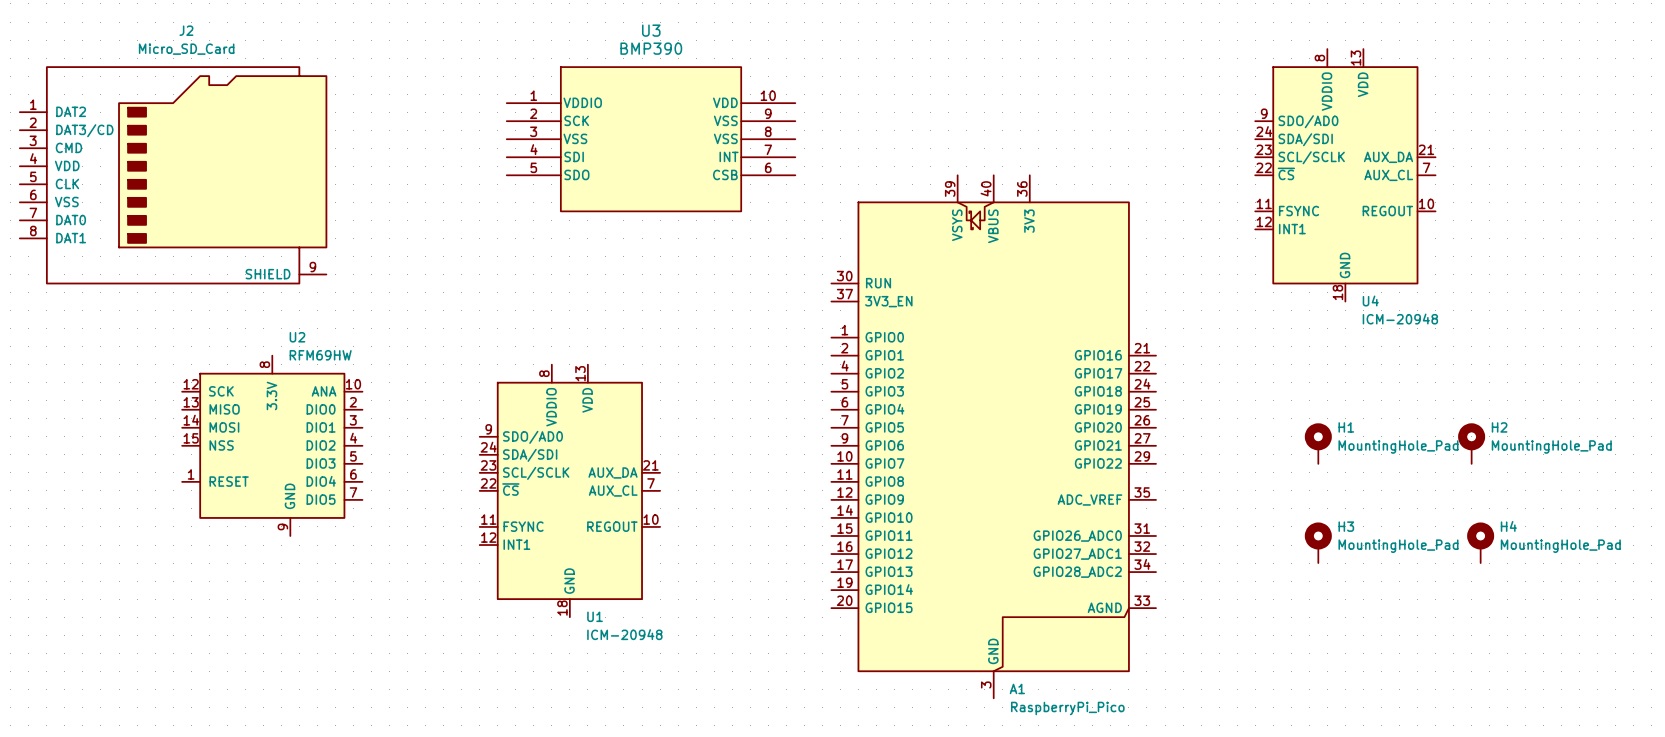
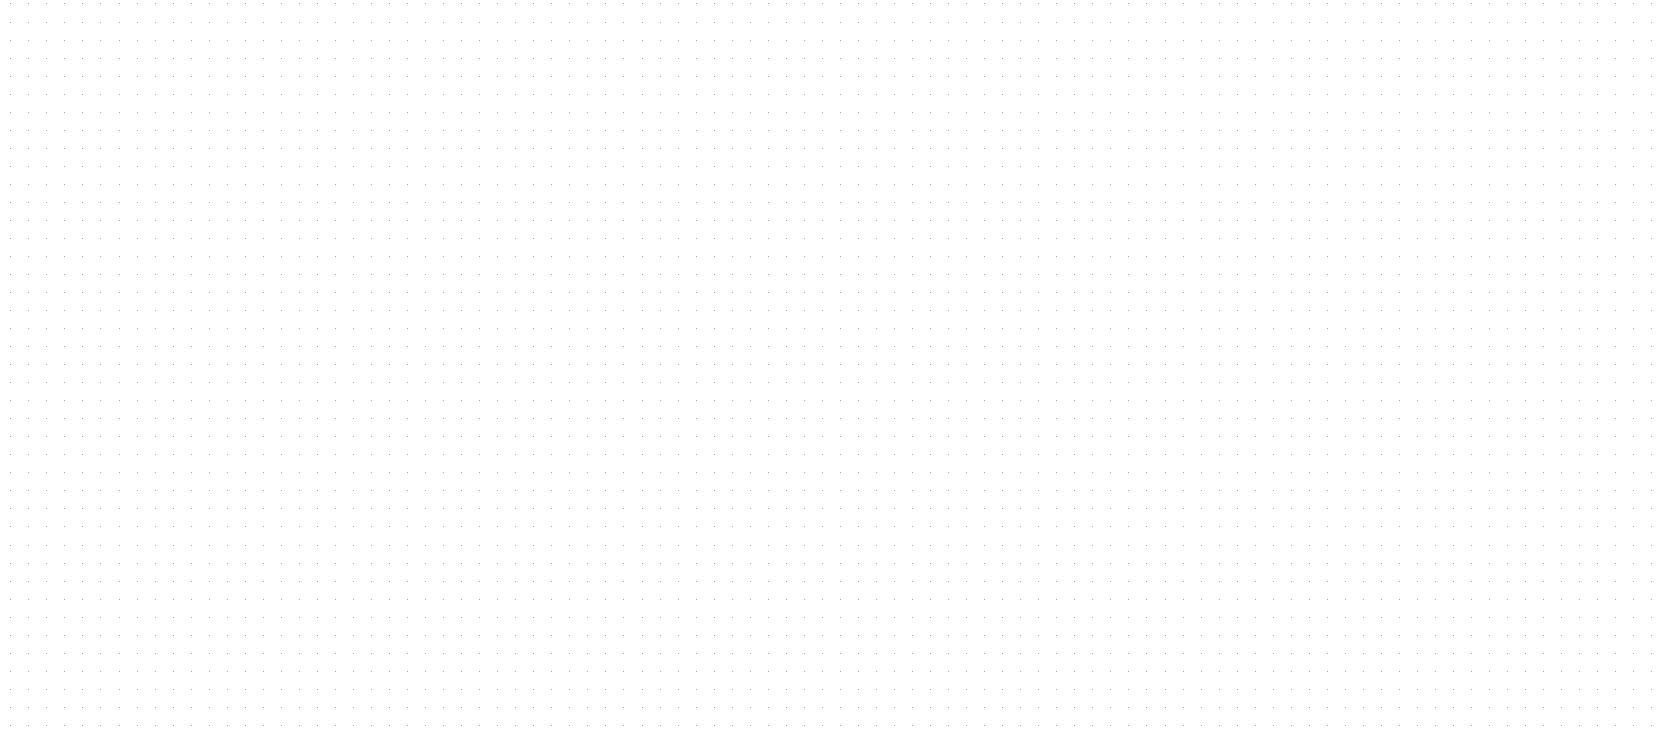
U3: BMP390 (651, 139) -> none
J2: Micro_SD_Card (173, 175) -> none
U4: ICM-20948 (1345, 175) -> none
A1: RaspberryPi_Pico (993, 436) -> none
H1: MountingHole_Pad (1318, 443) -> none
H2: MountingHole_Pad (1471, 443) -> none
U2: RFM69HW (272, 445) -> none
U1: ICM-20948 (569, 490) -> none
H3: MountingHole_Pad (1318, 542) -> none
H4: MountingHole_Pad (1480, 542) -> none

